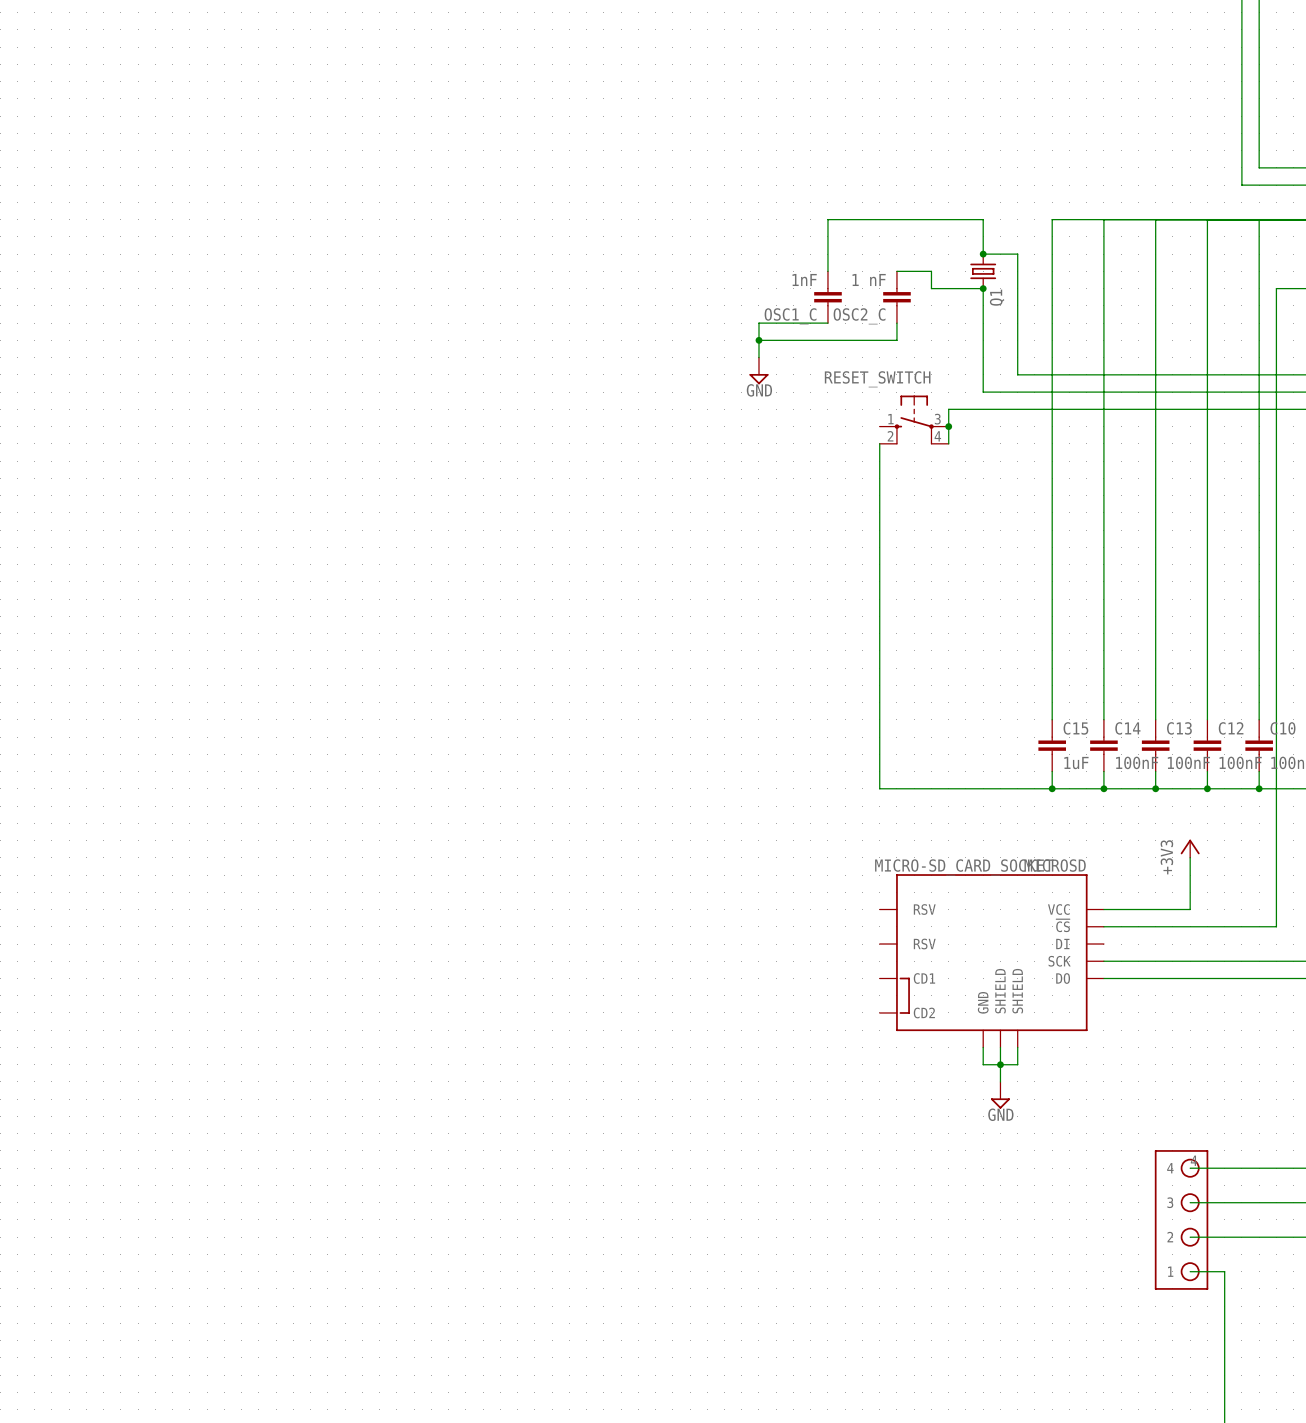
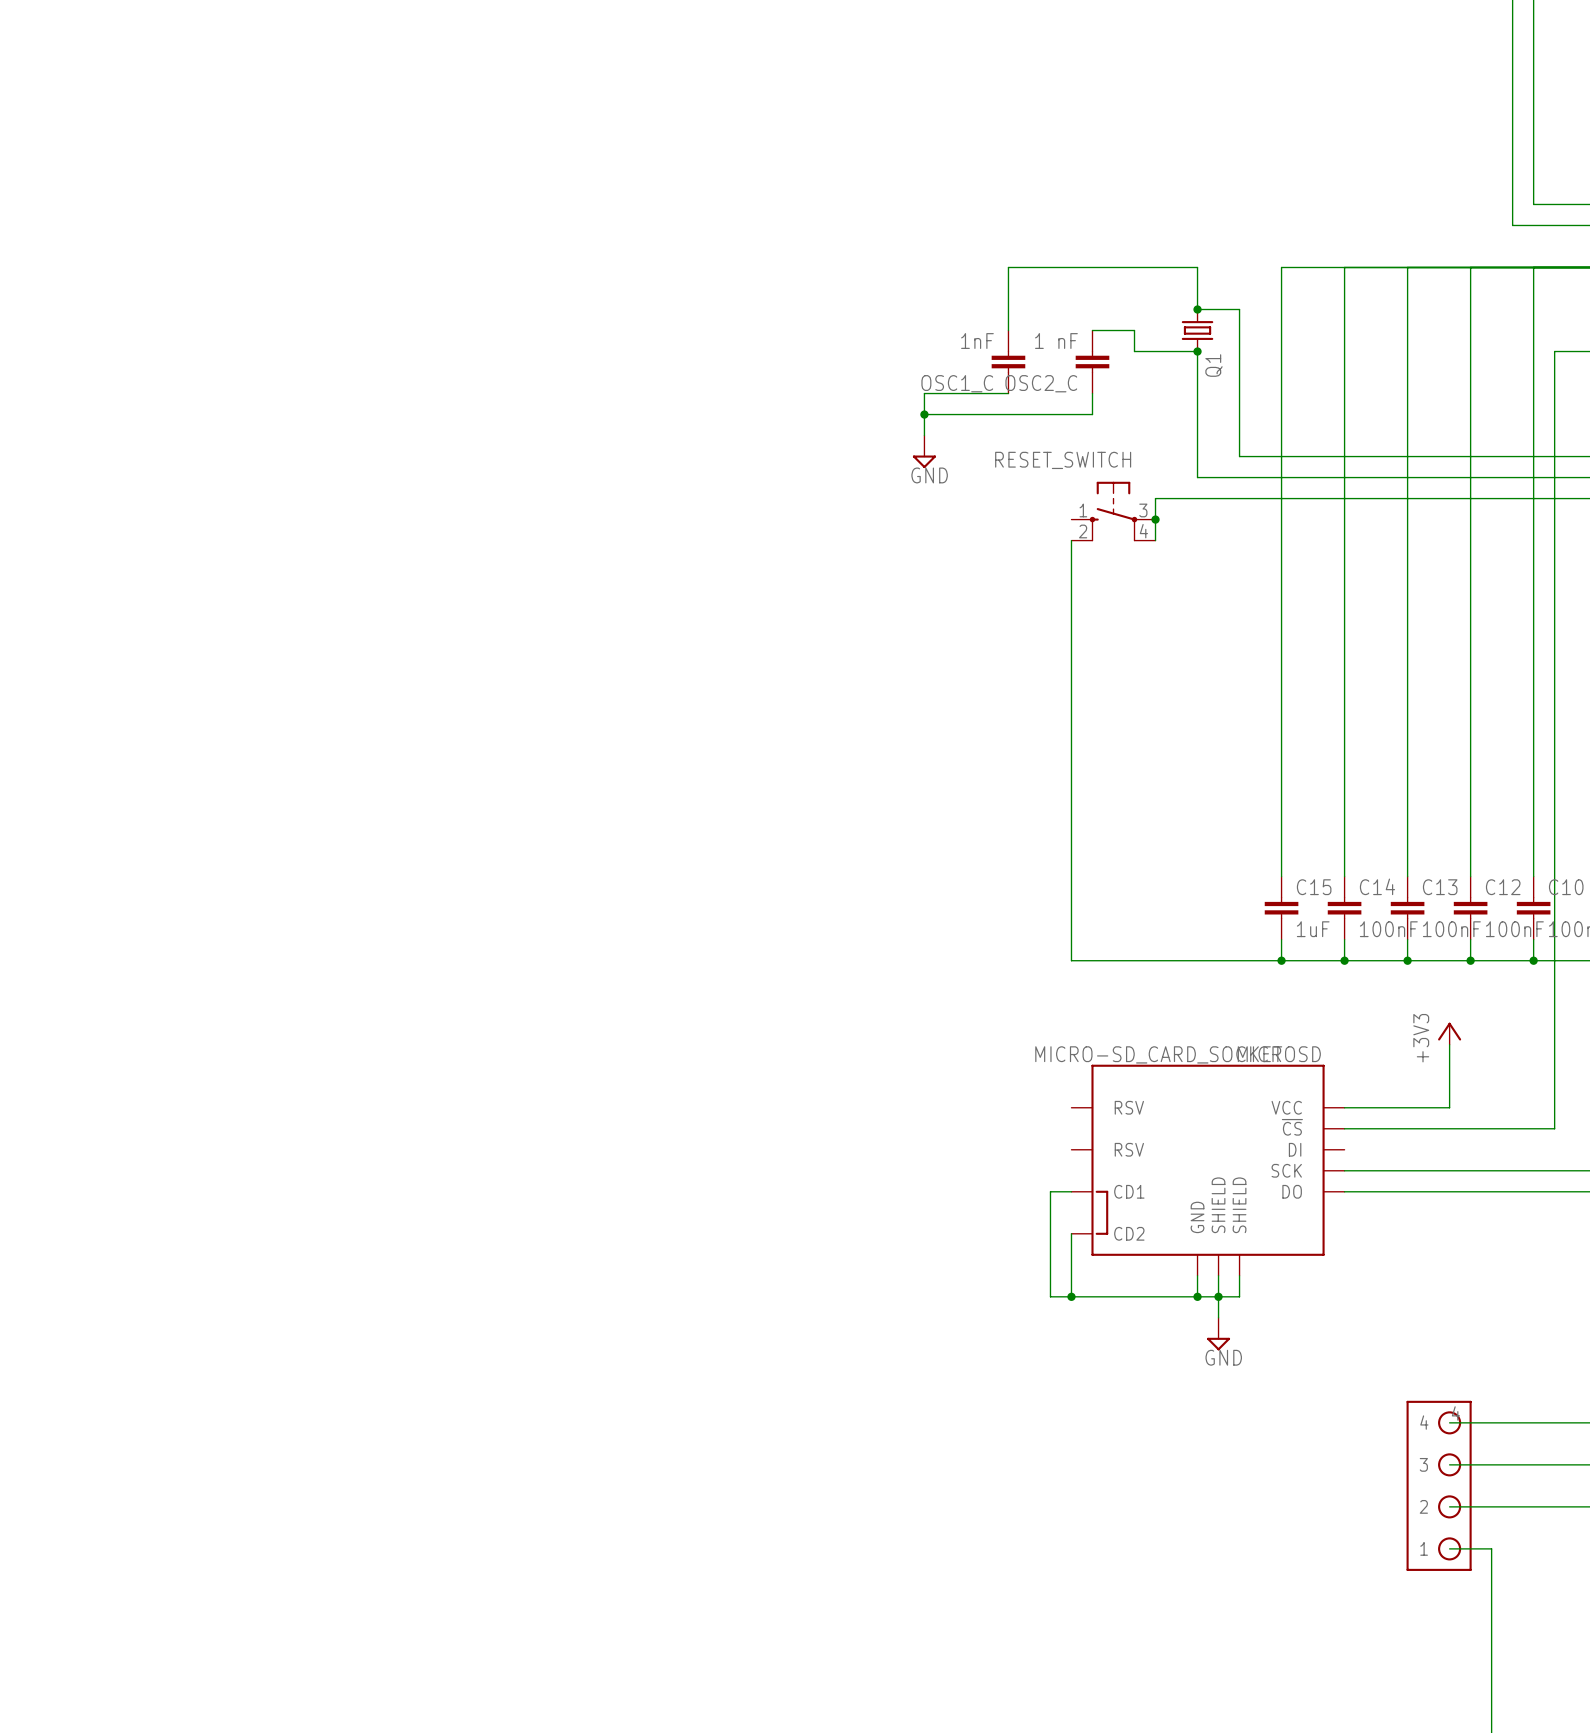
wire: none -> (1071, 1191) (1050, 1191) (1050, 1296) (1197, 1296)
wire: none -> (1071, 1233) (1071, 1296)
junction: none -> (1071, 1296)
junction: none -> (1197, 1296)

